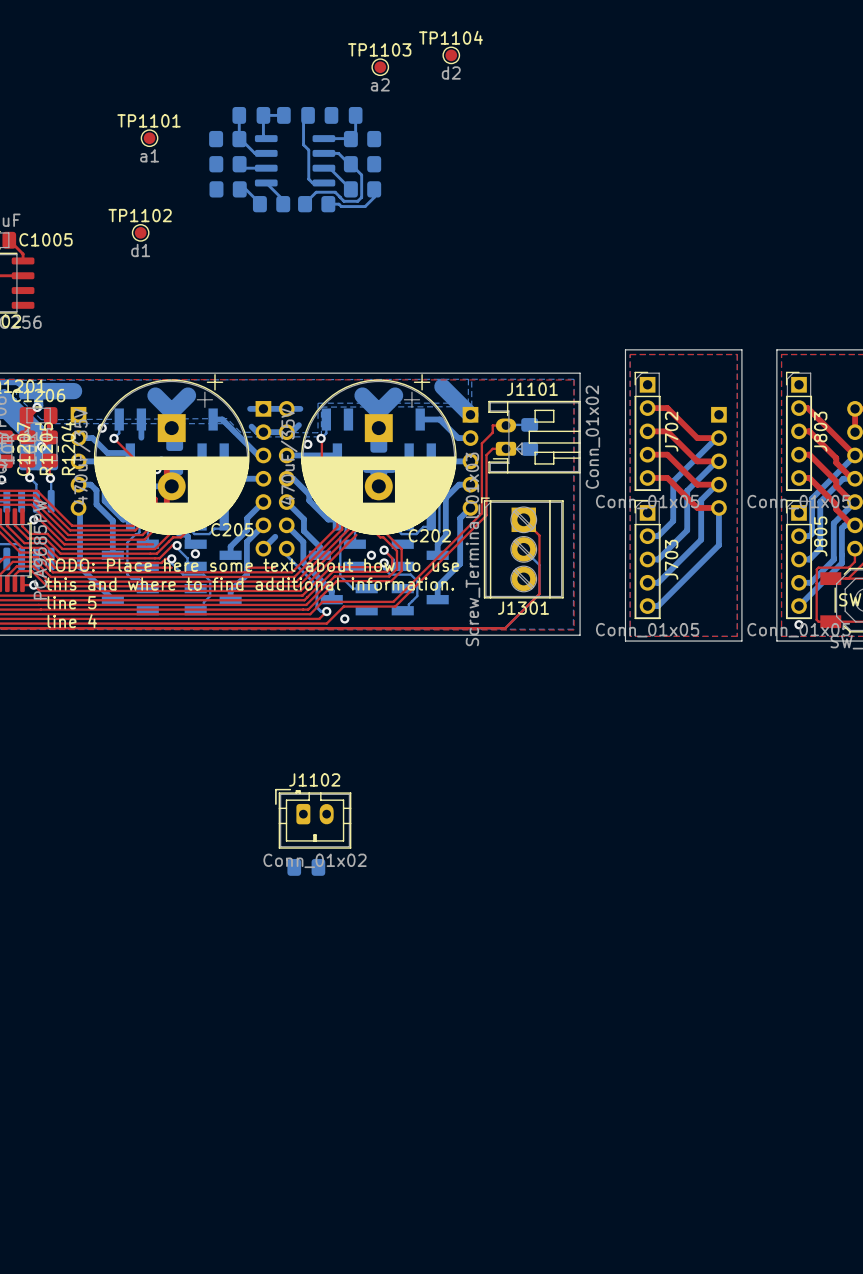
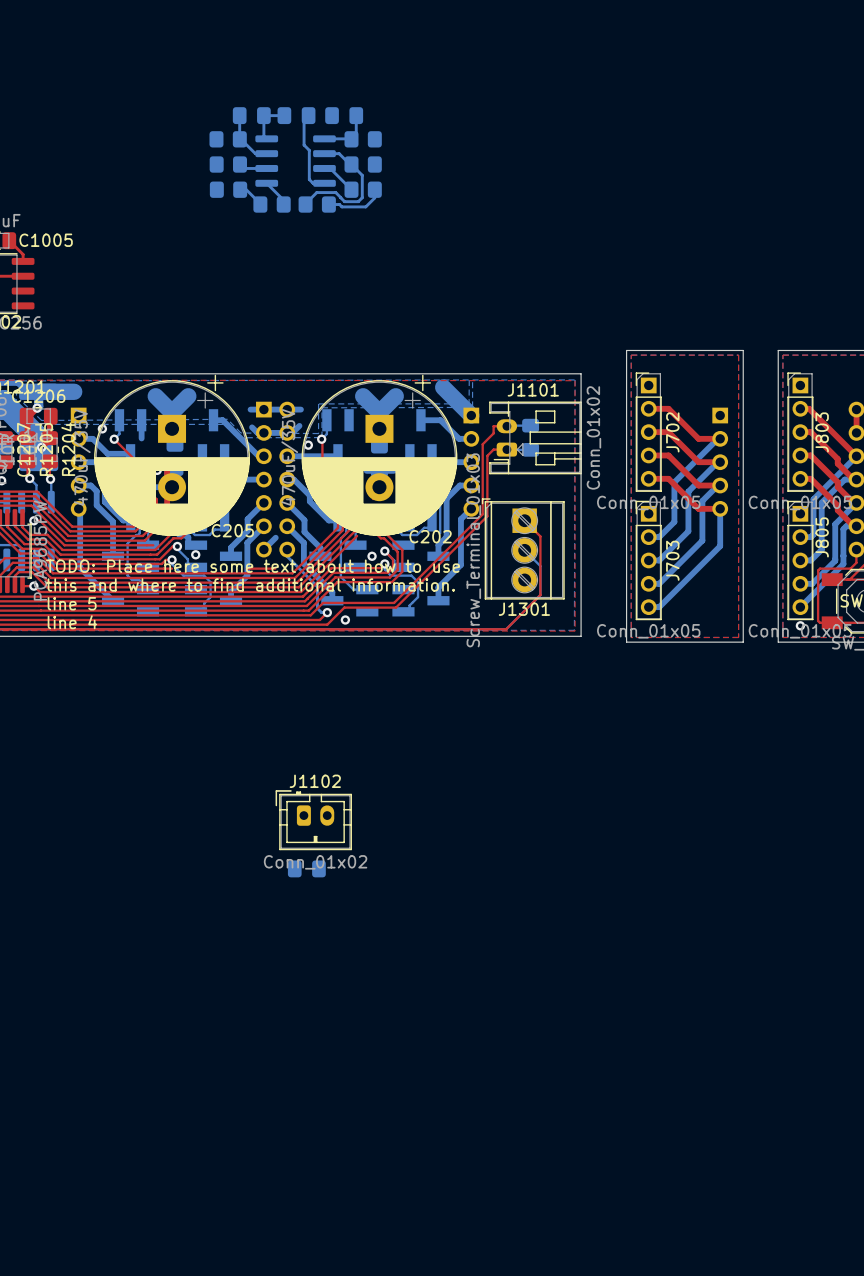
TP1104: d2 (451, 55) -> none
TP1103: a2 (380, 67) -> none
TP1101: a1 (149, 138) -> none
TP1102: d1 (140, 232) -> none

